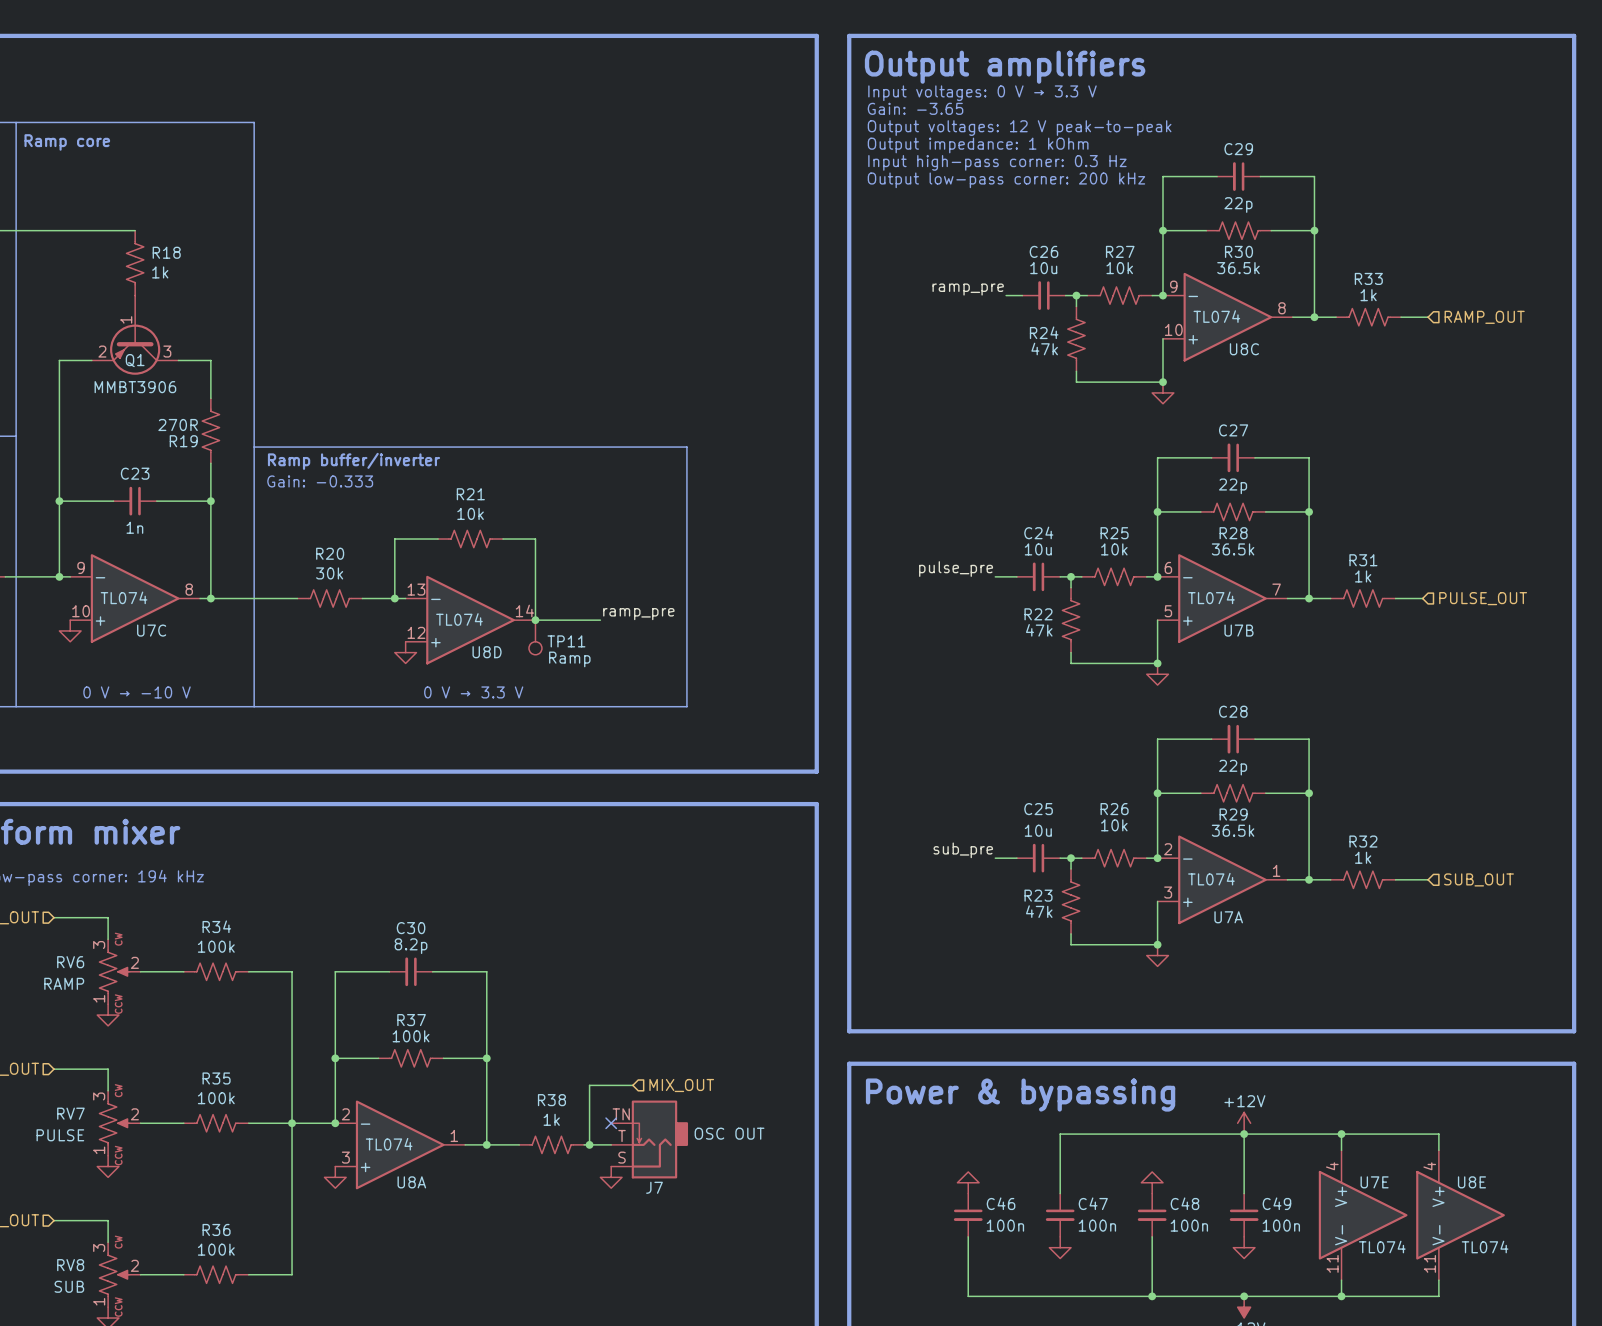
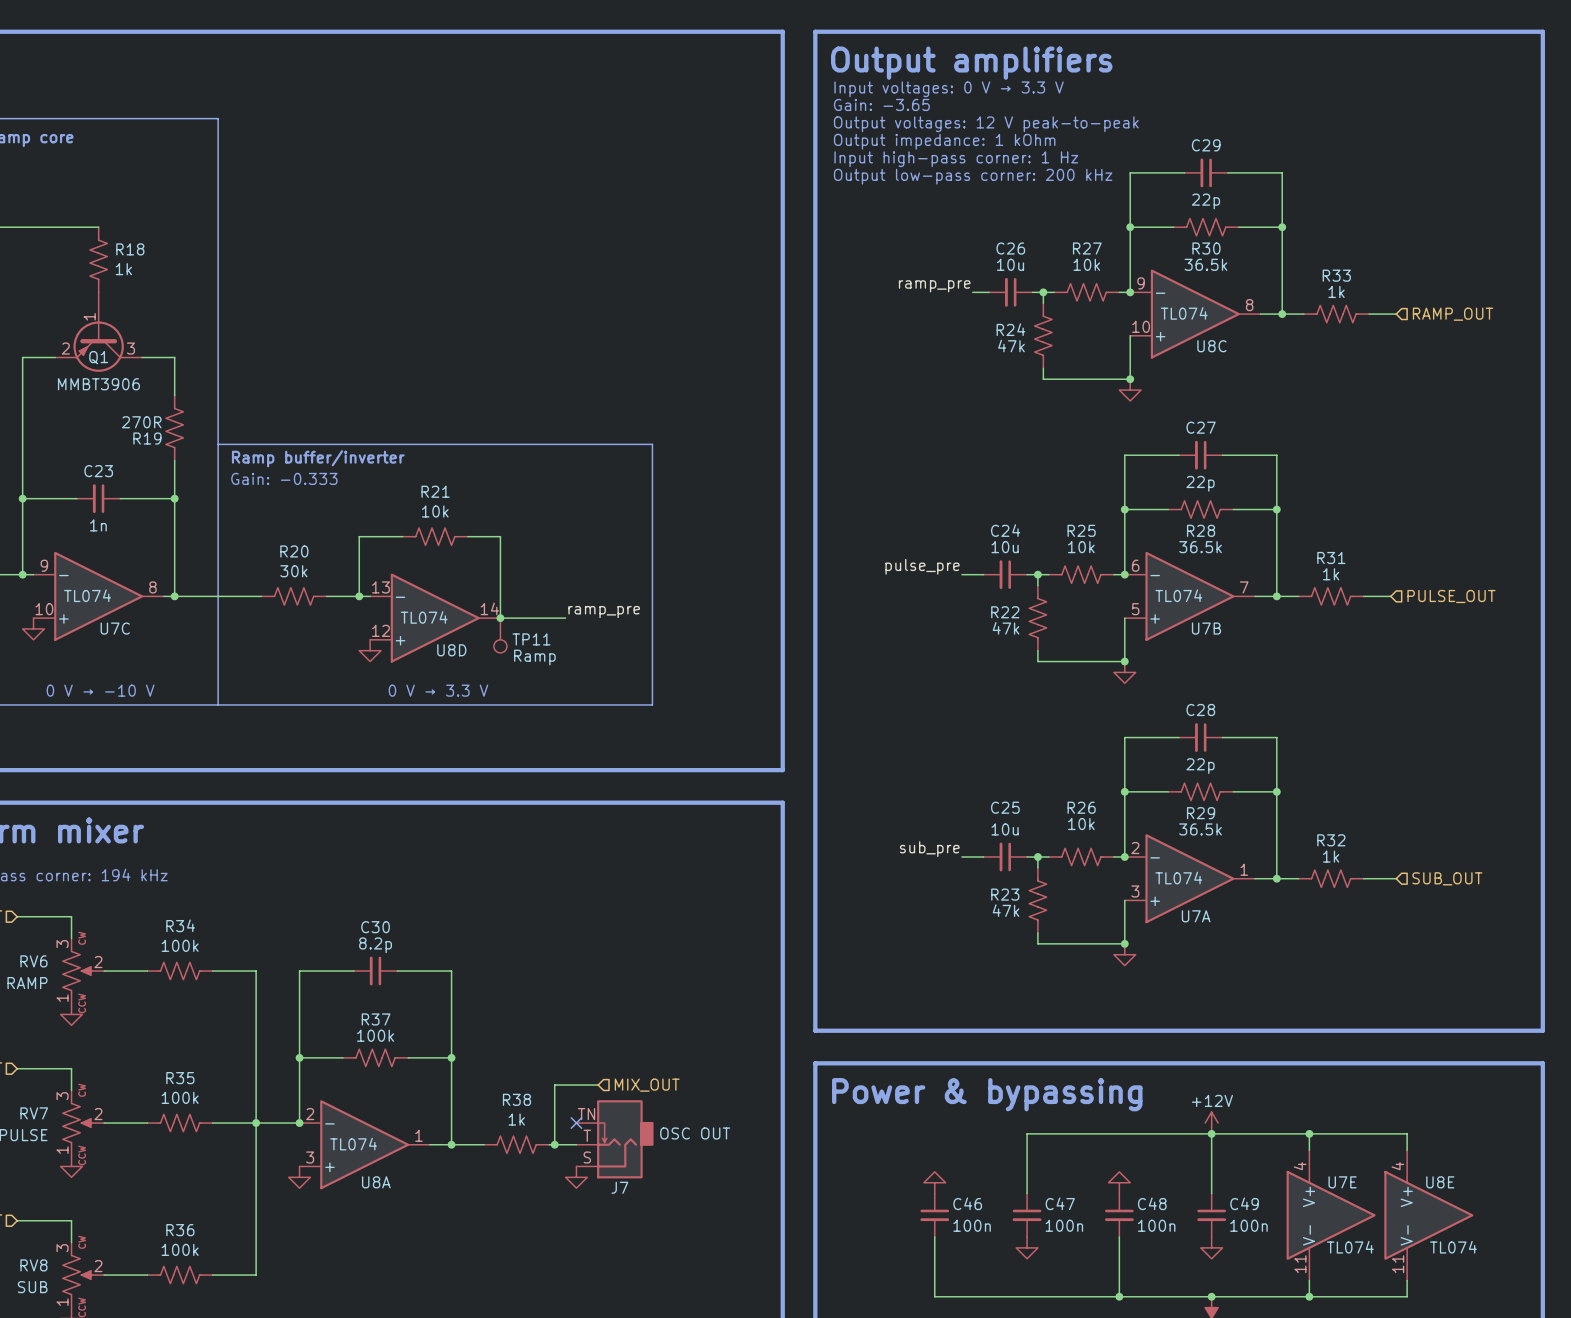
text: Input high-pass corner: 0.3 Hz (997, 162) -> Input high-pass corner: 1 Hz (956, 159)

